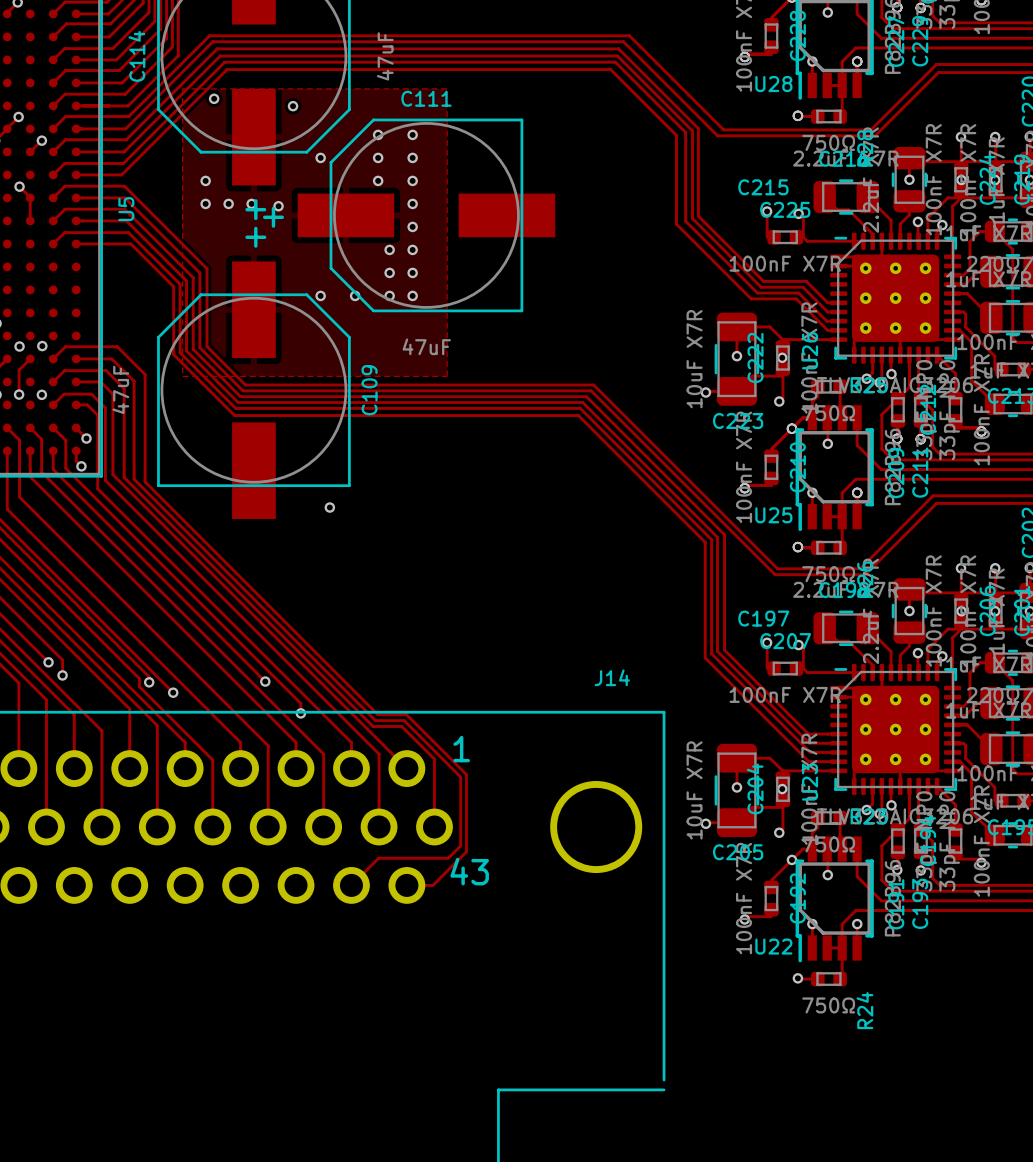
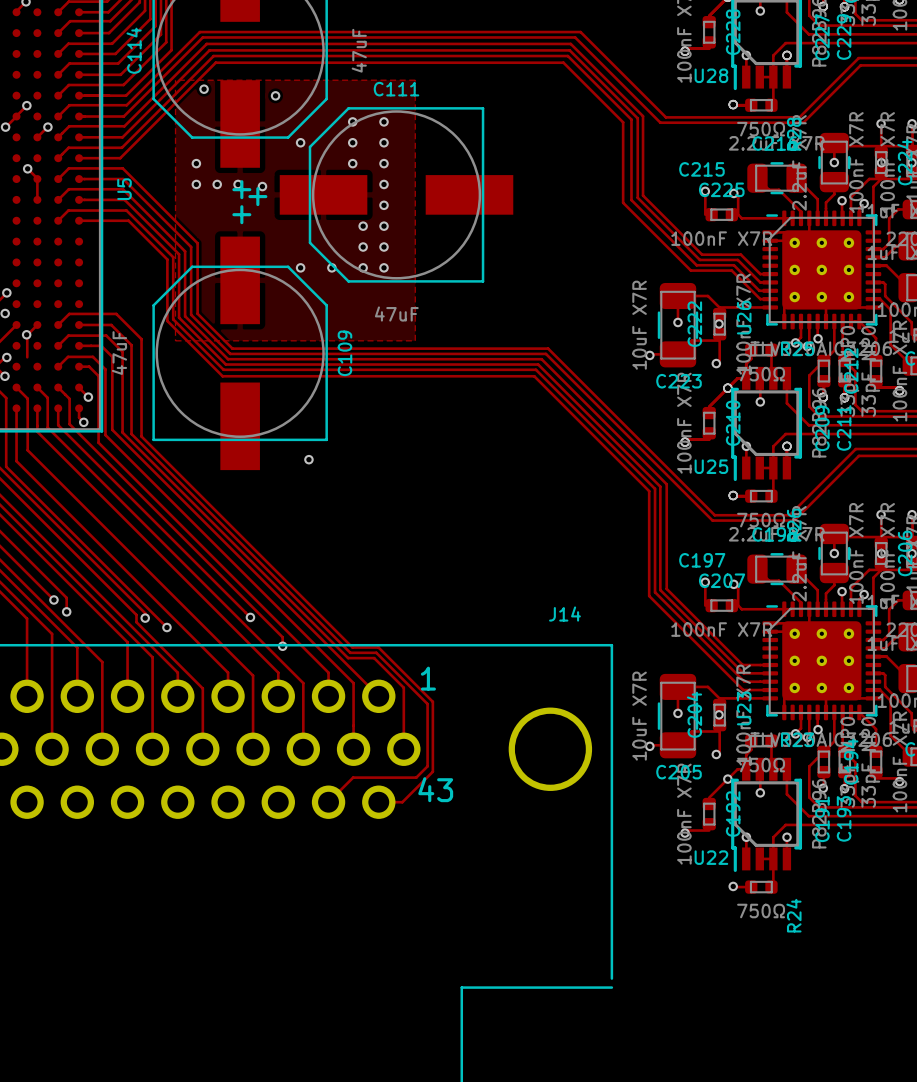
via: (19, 346) -> none
via: (42, 346) -> none
via: none -> (26, 334)
via: (19, 394) -> none
via: (41, 394) -> none

